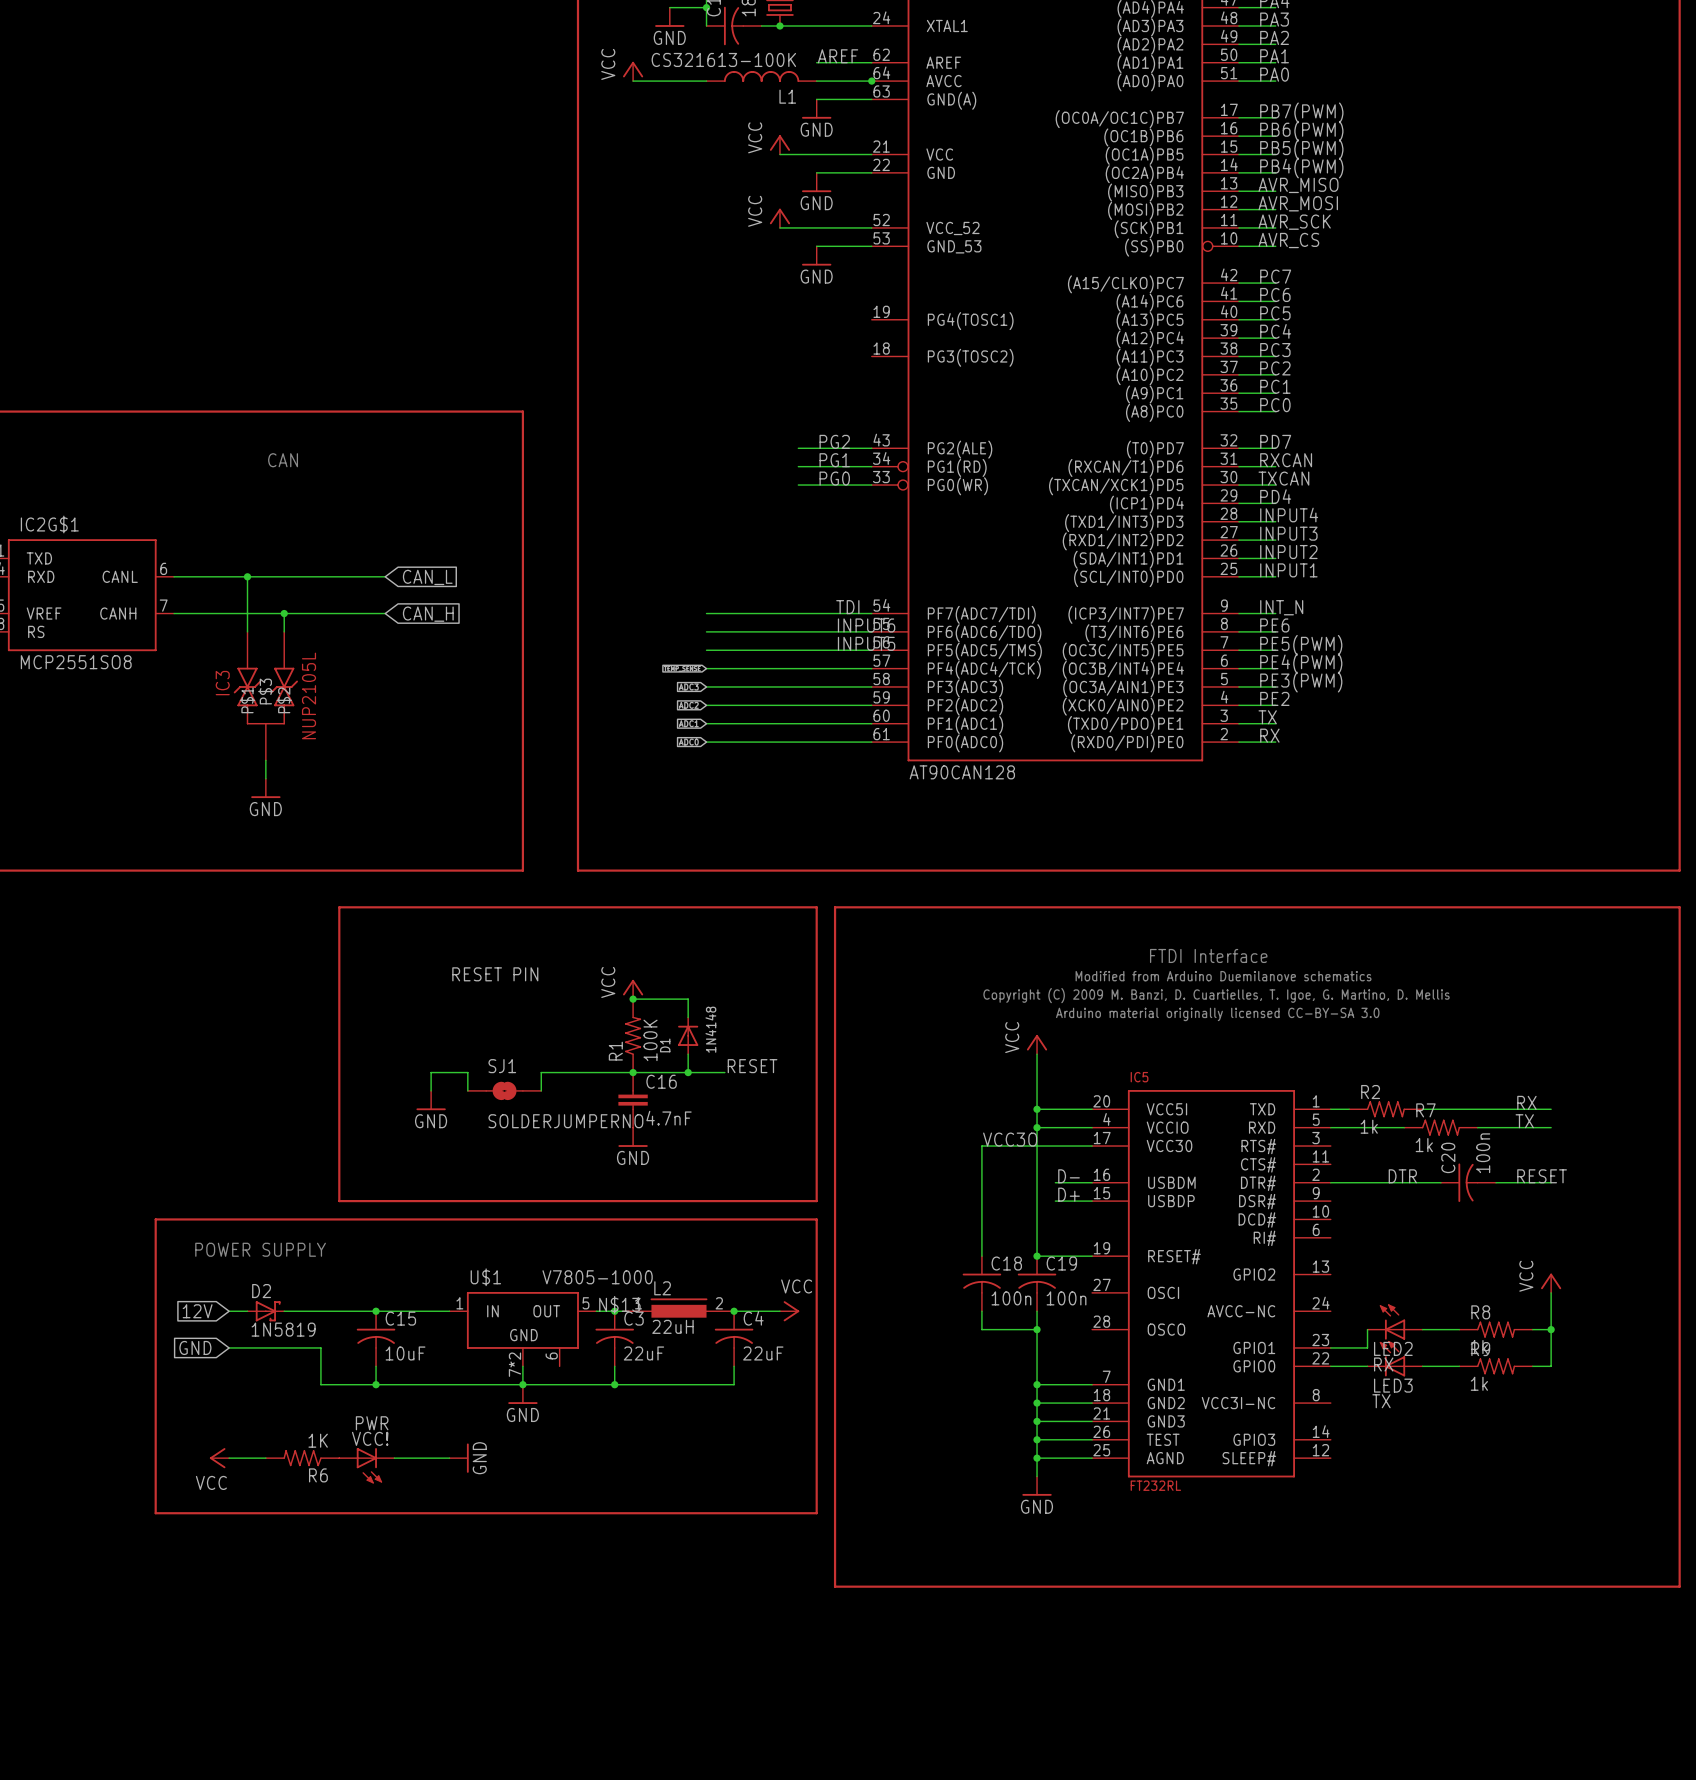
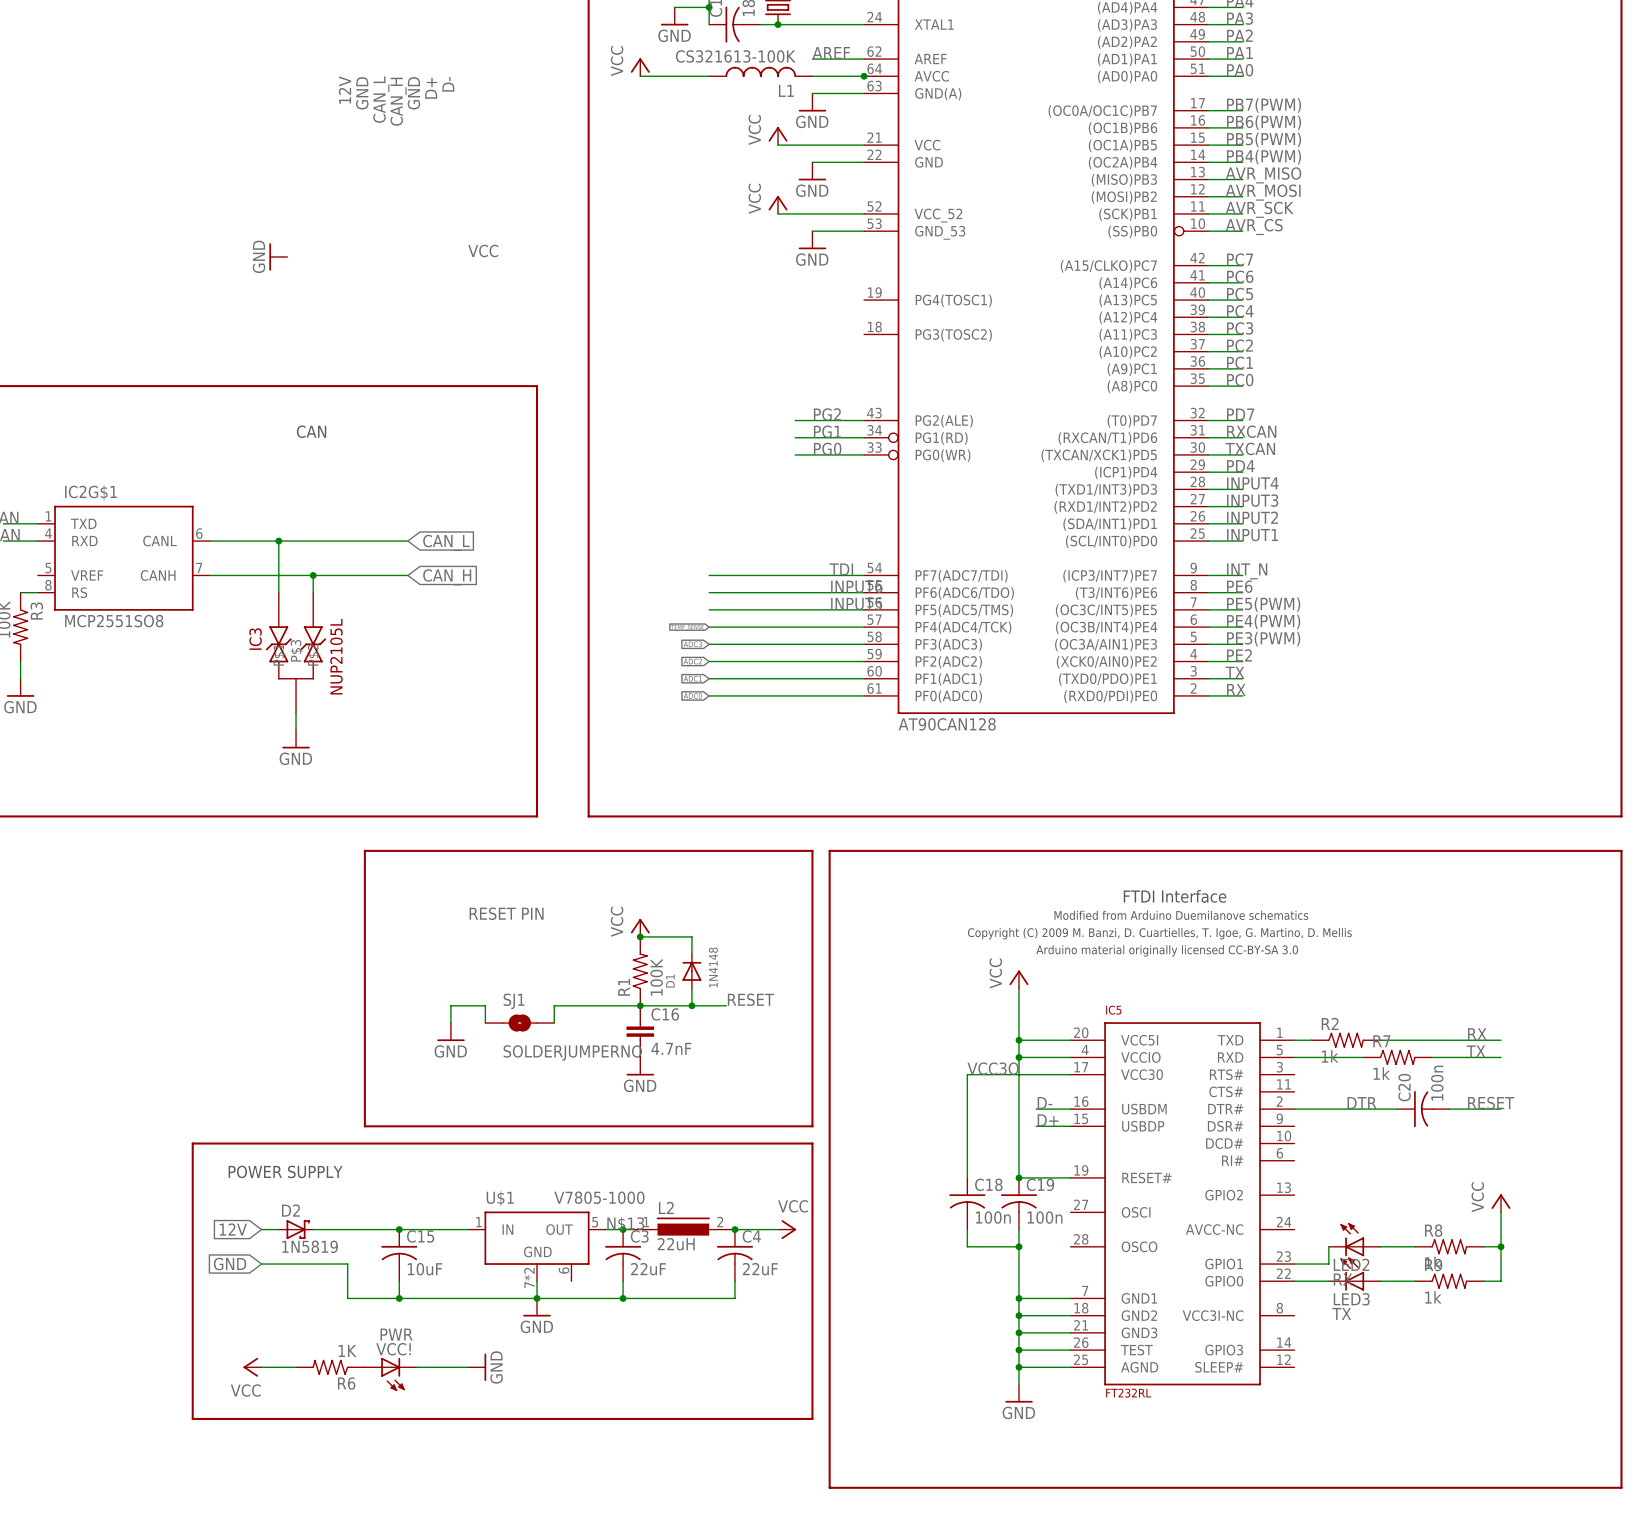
label: none -> D+ (431, 88)
label: none -> D- (448, 84)
label: none -> 12V (344, 90)
label: none -> GND (362, 93)
label: none -> GND (413, 93)
label: none -> CAN_L (381, 99)
label: none -> CAN_H (398, 101)
label: none -> VCC (483, 250)
power symbol: none -> GND (278, 257)

